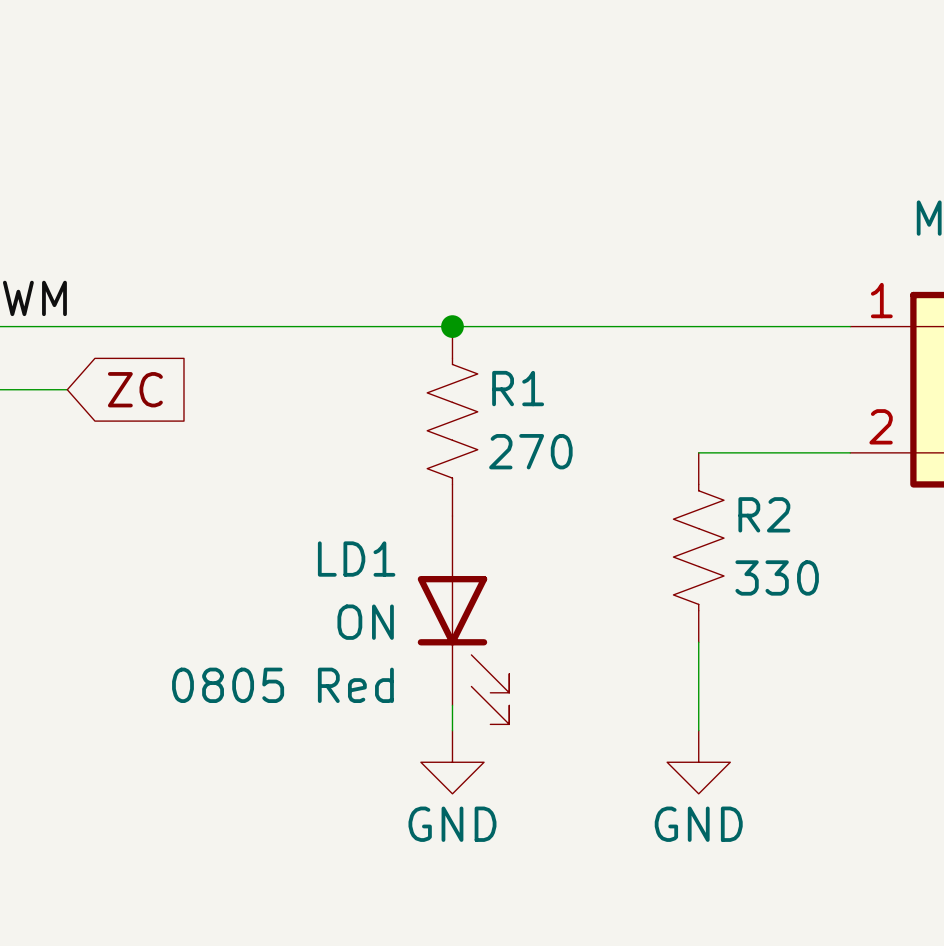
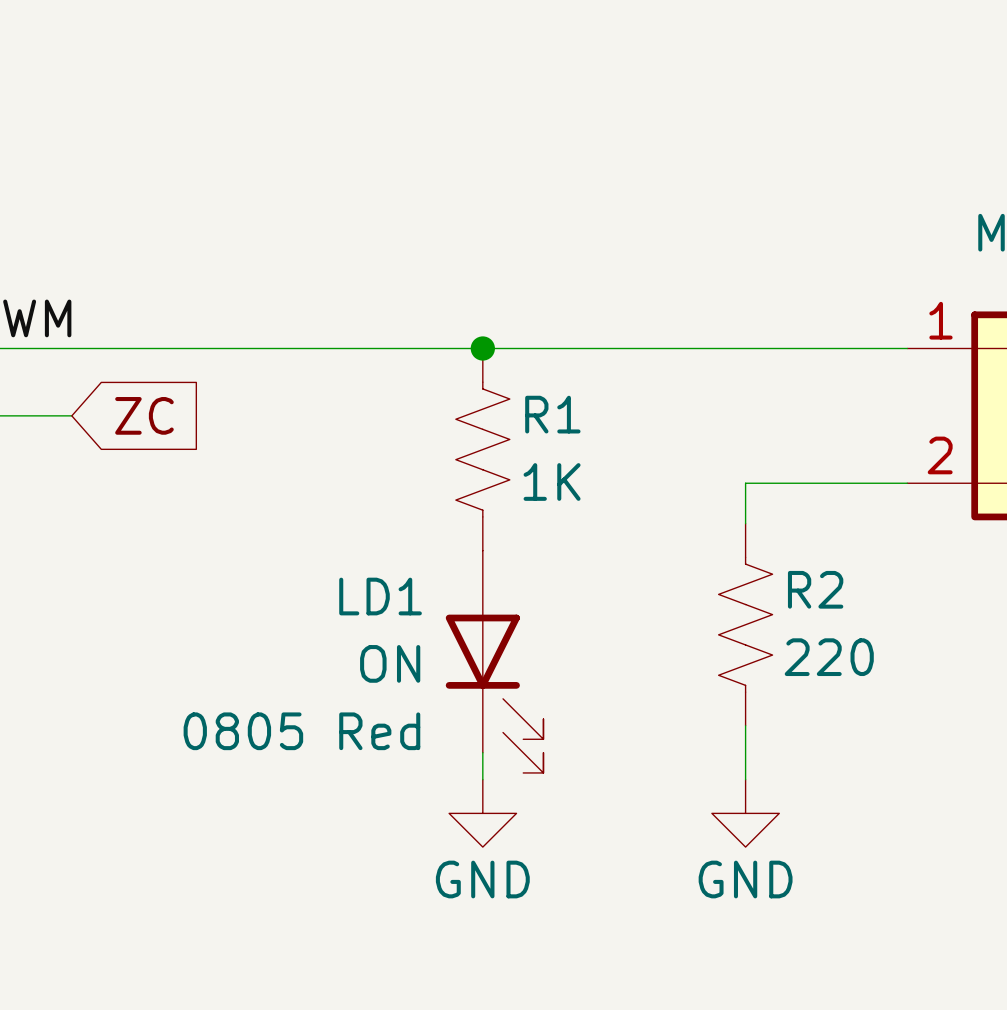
R1 value: 270 (530, 451) -> 1K (552, 481)
R2 position: (698, 547) -> (745, 624)
R2 value: 330 (777, 577) -> 220 (829, 657)

